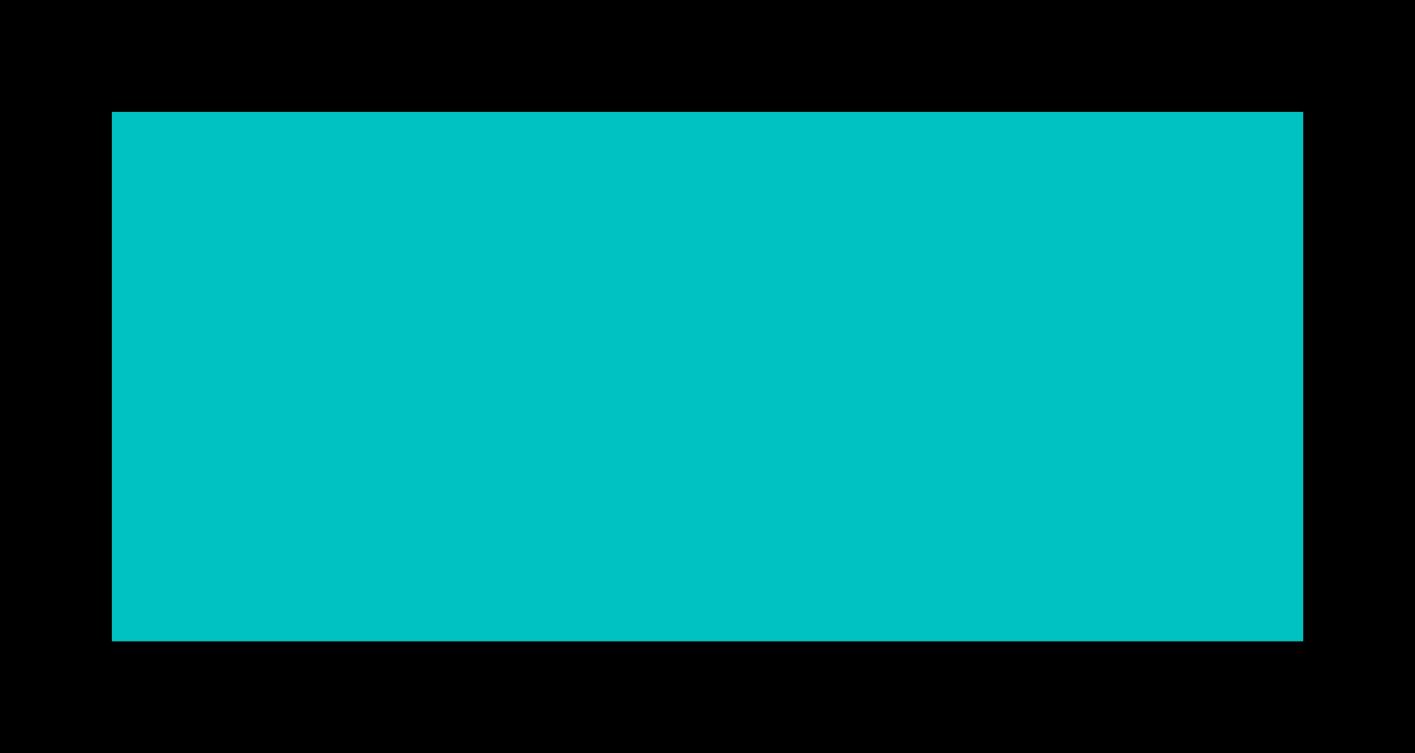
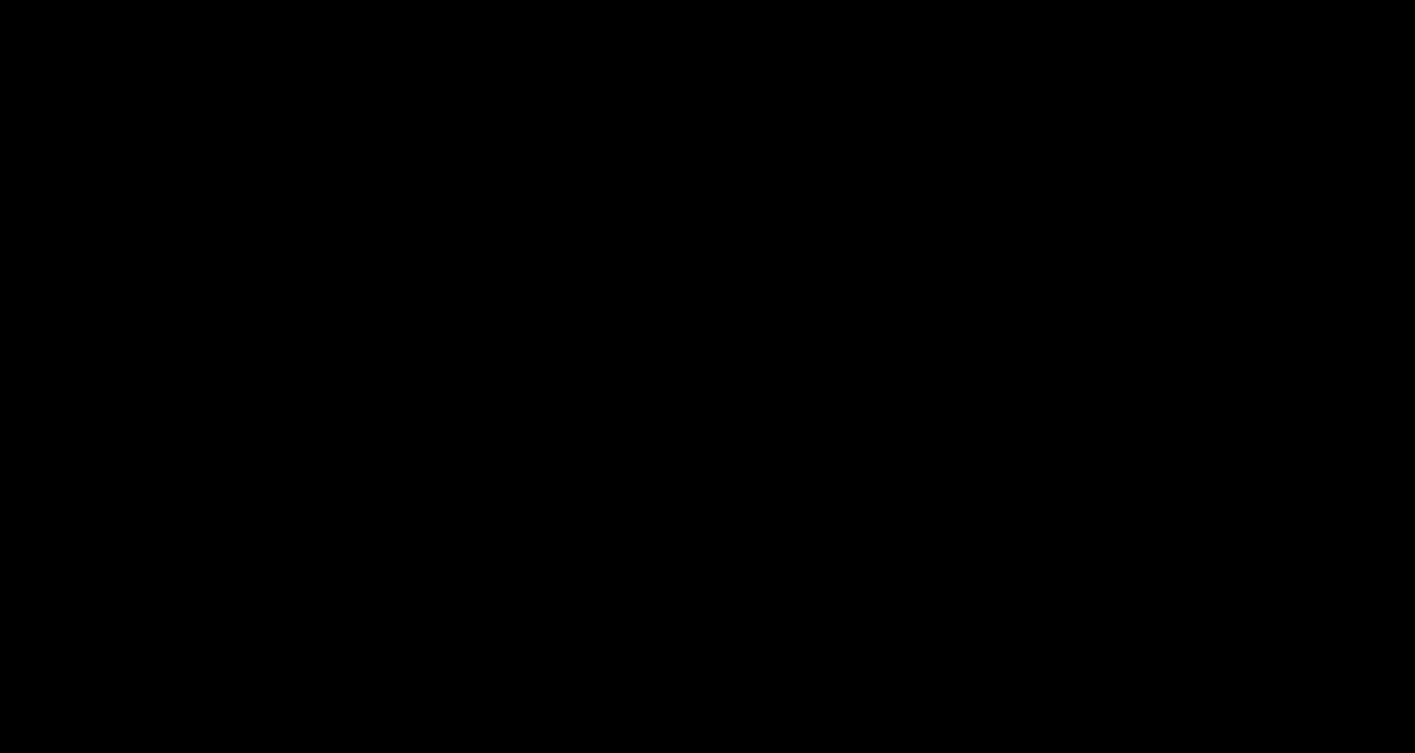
drawing: [111, 111, 1304, 642] -> none

